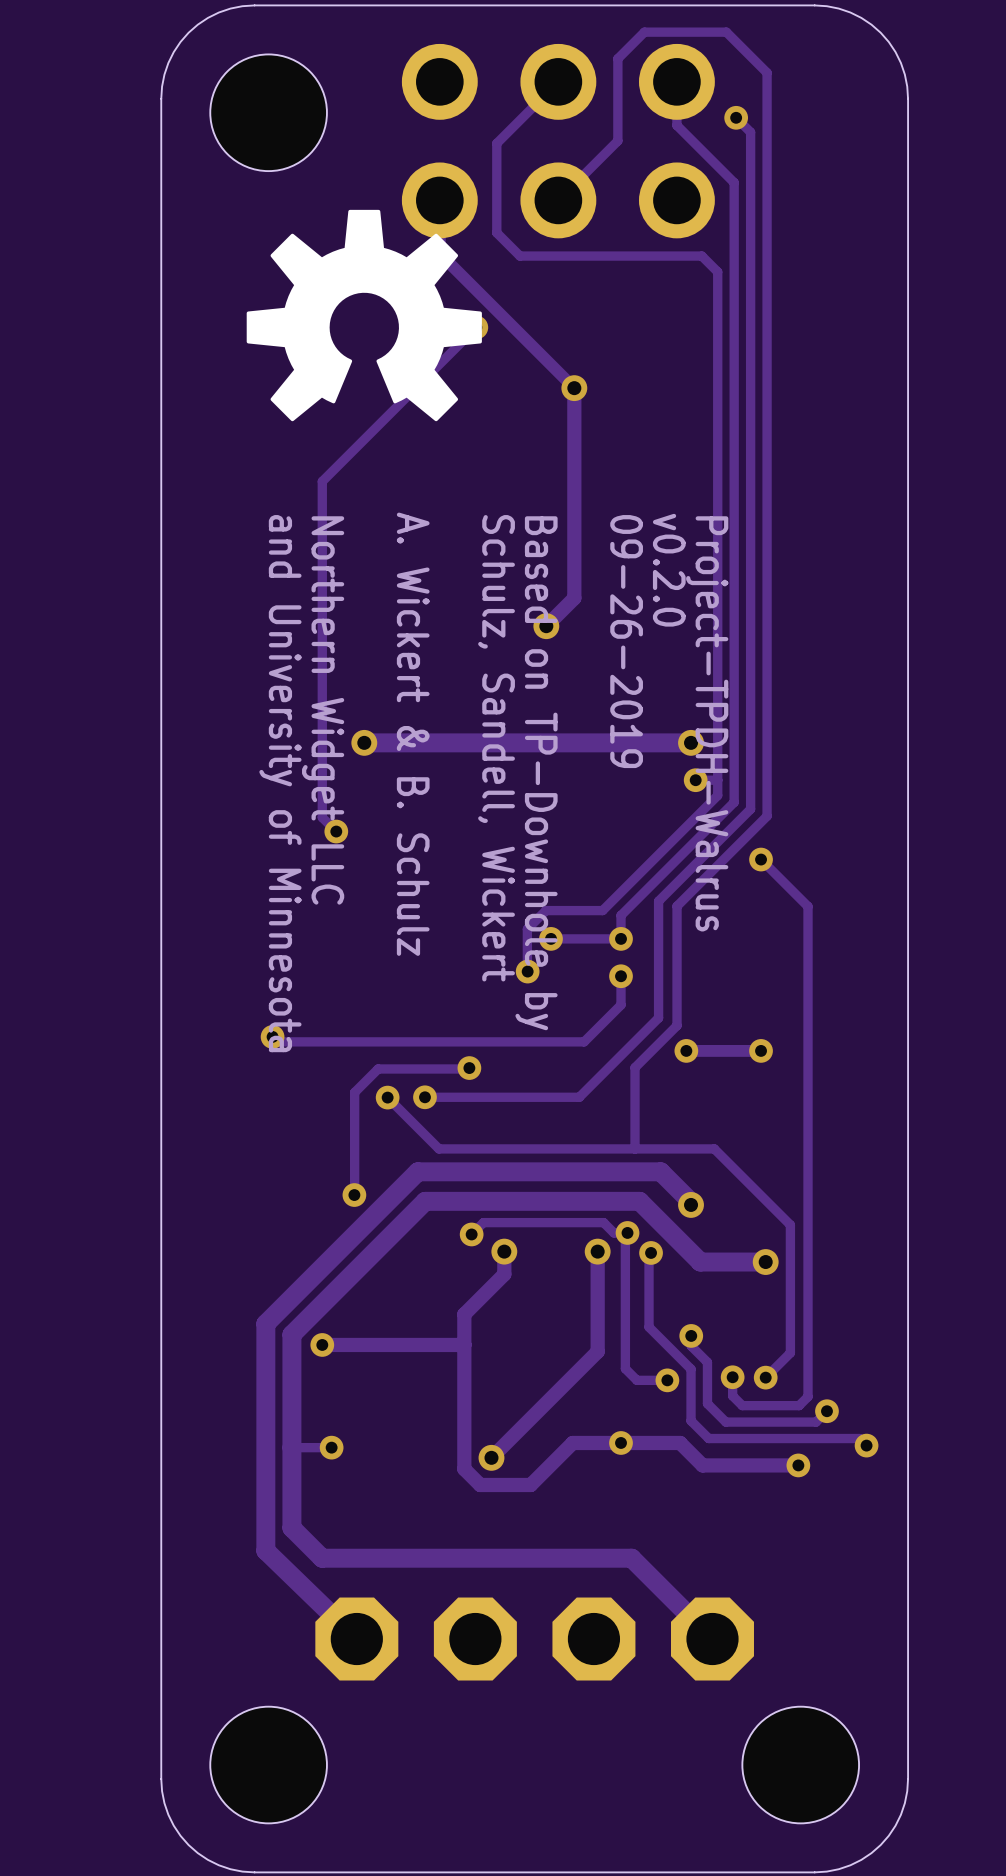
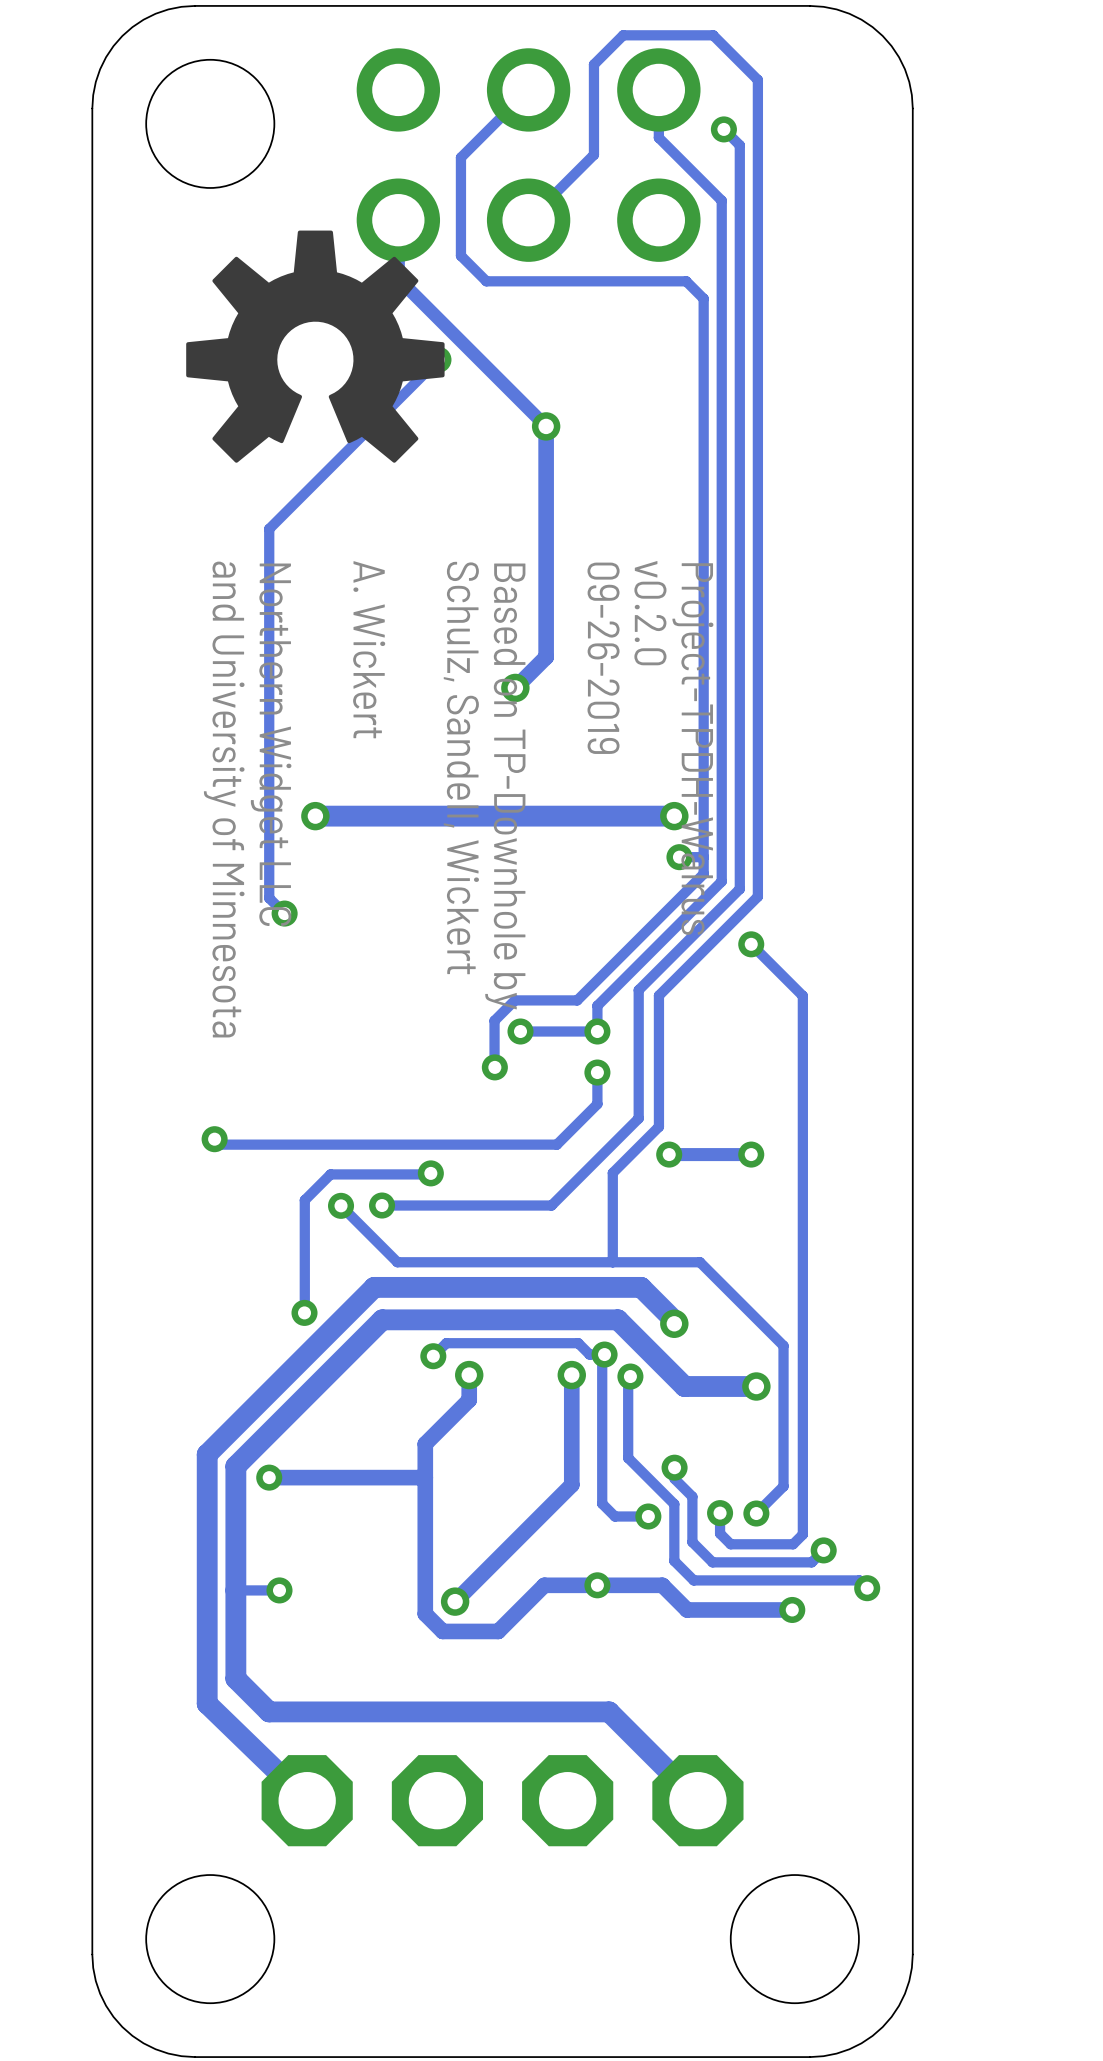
text: A. Wickert & B. Schulz (413, 734) -> A. Wickert (369, 649)

